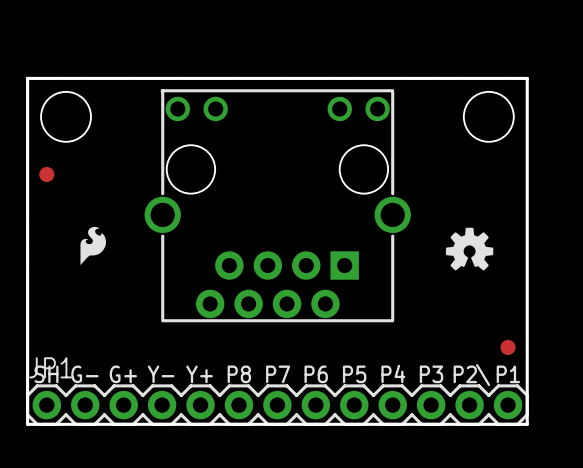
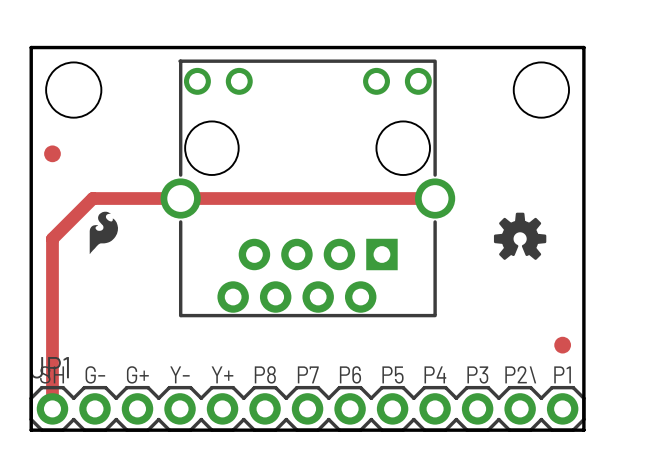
track: none -> (435, 198) (92, 198) (52, 238) (52, 408)

